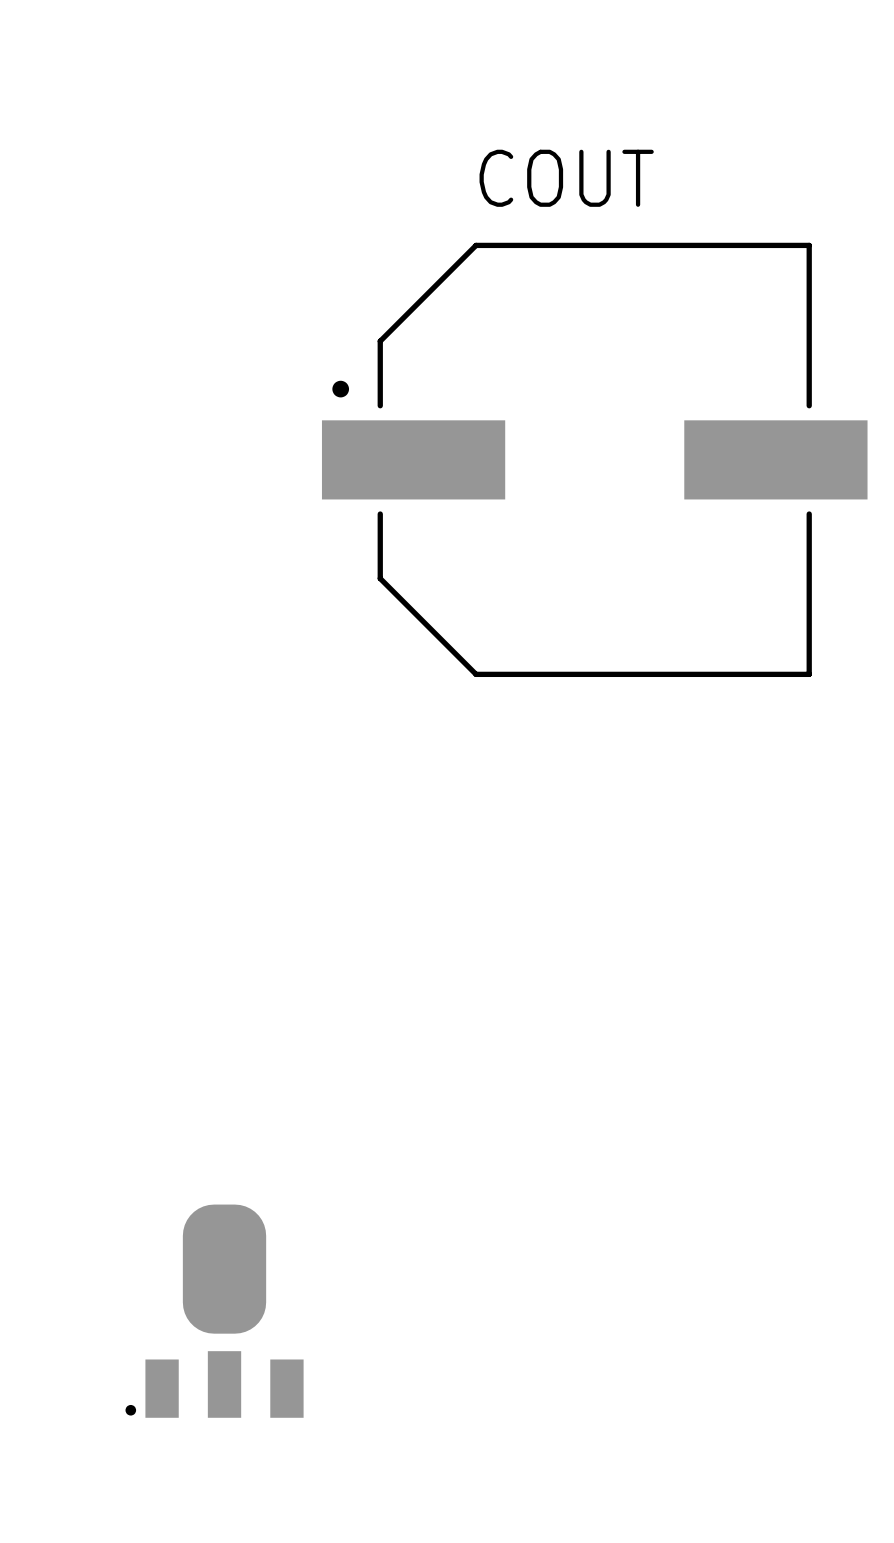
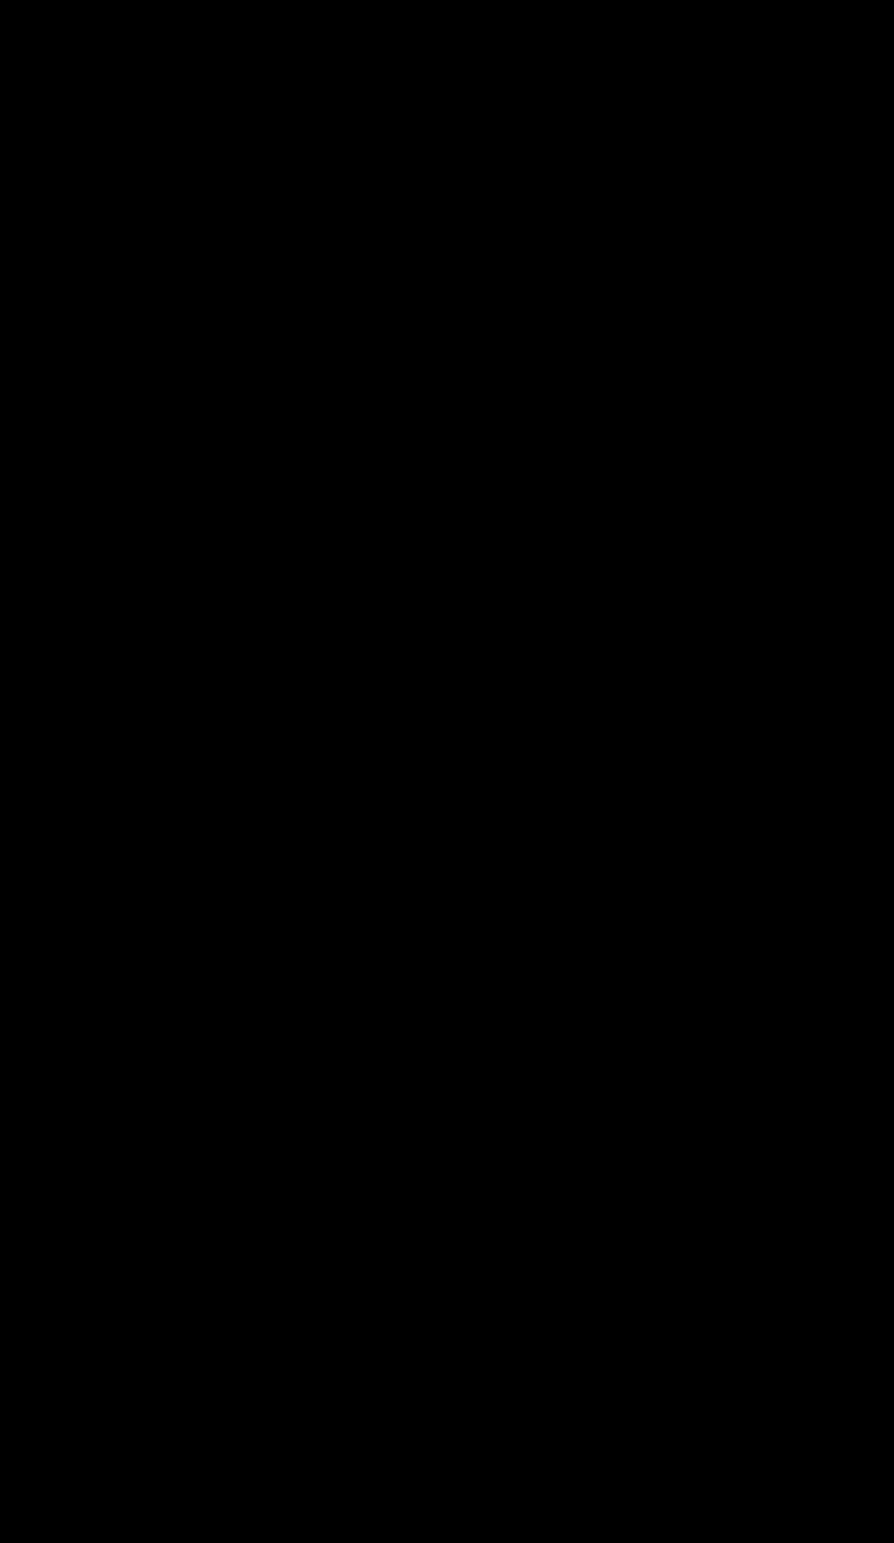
COUT: (594, 459) -> none
part: (214, 1311) -> none

